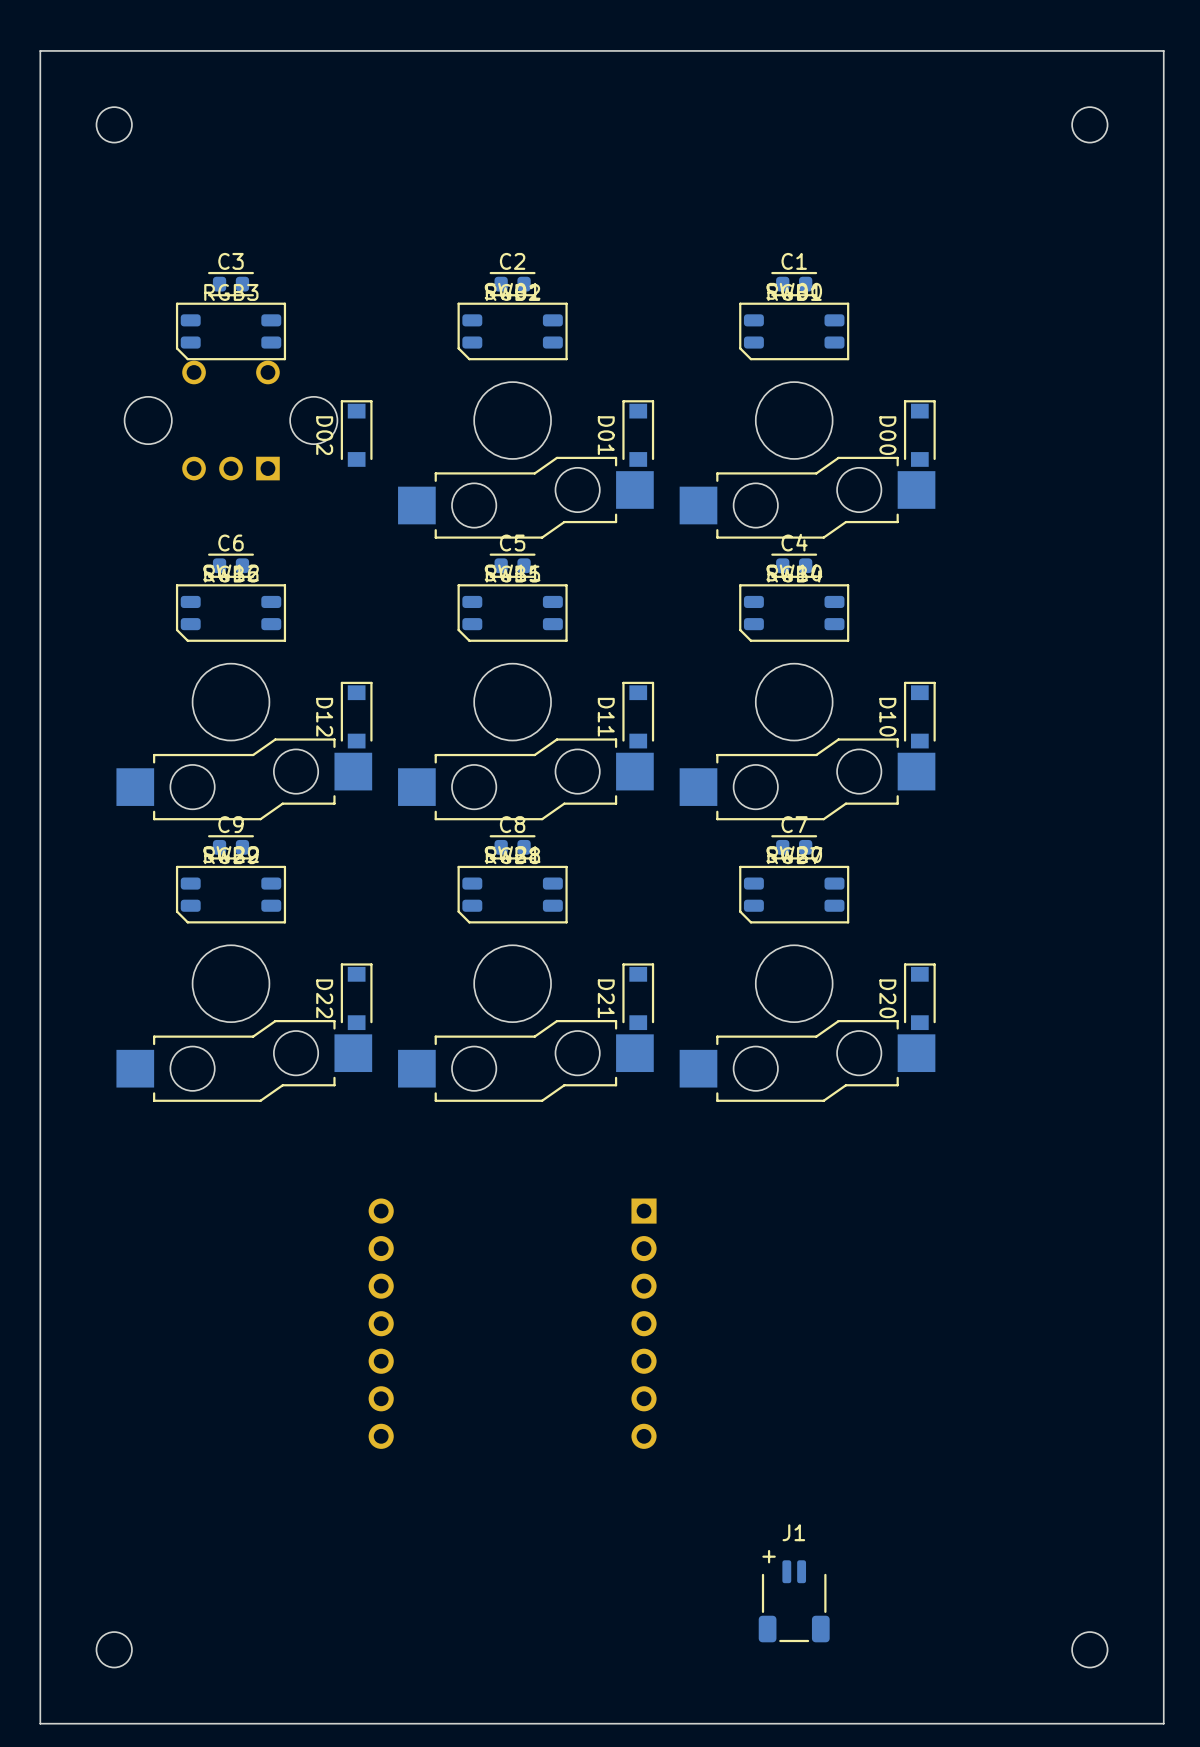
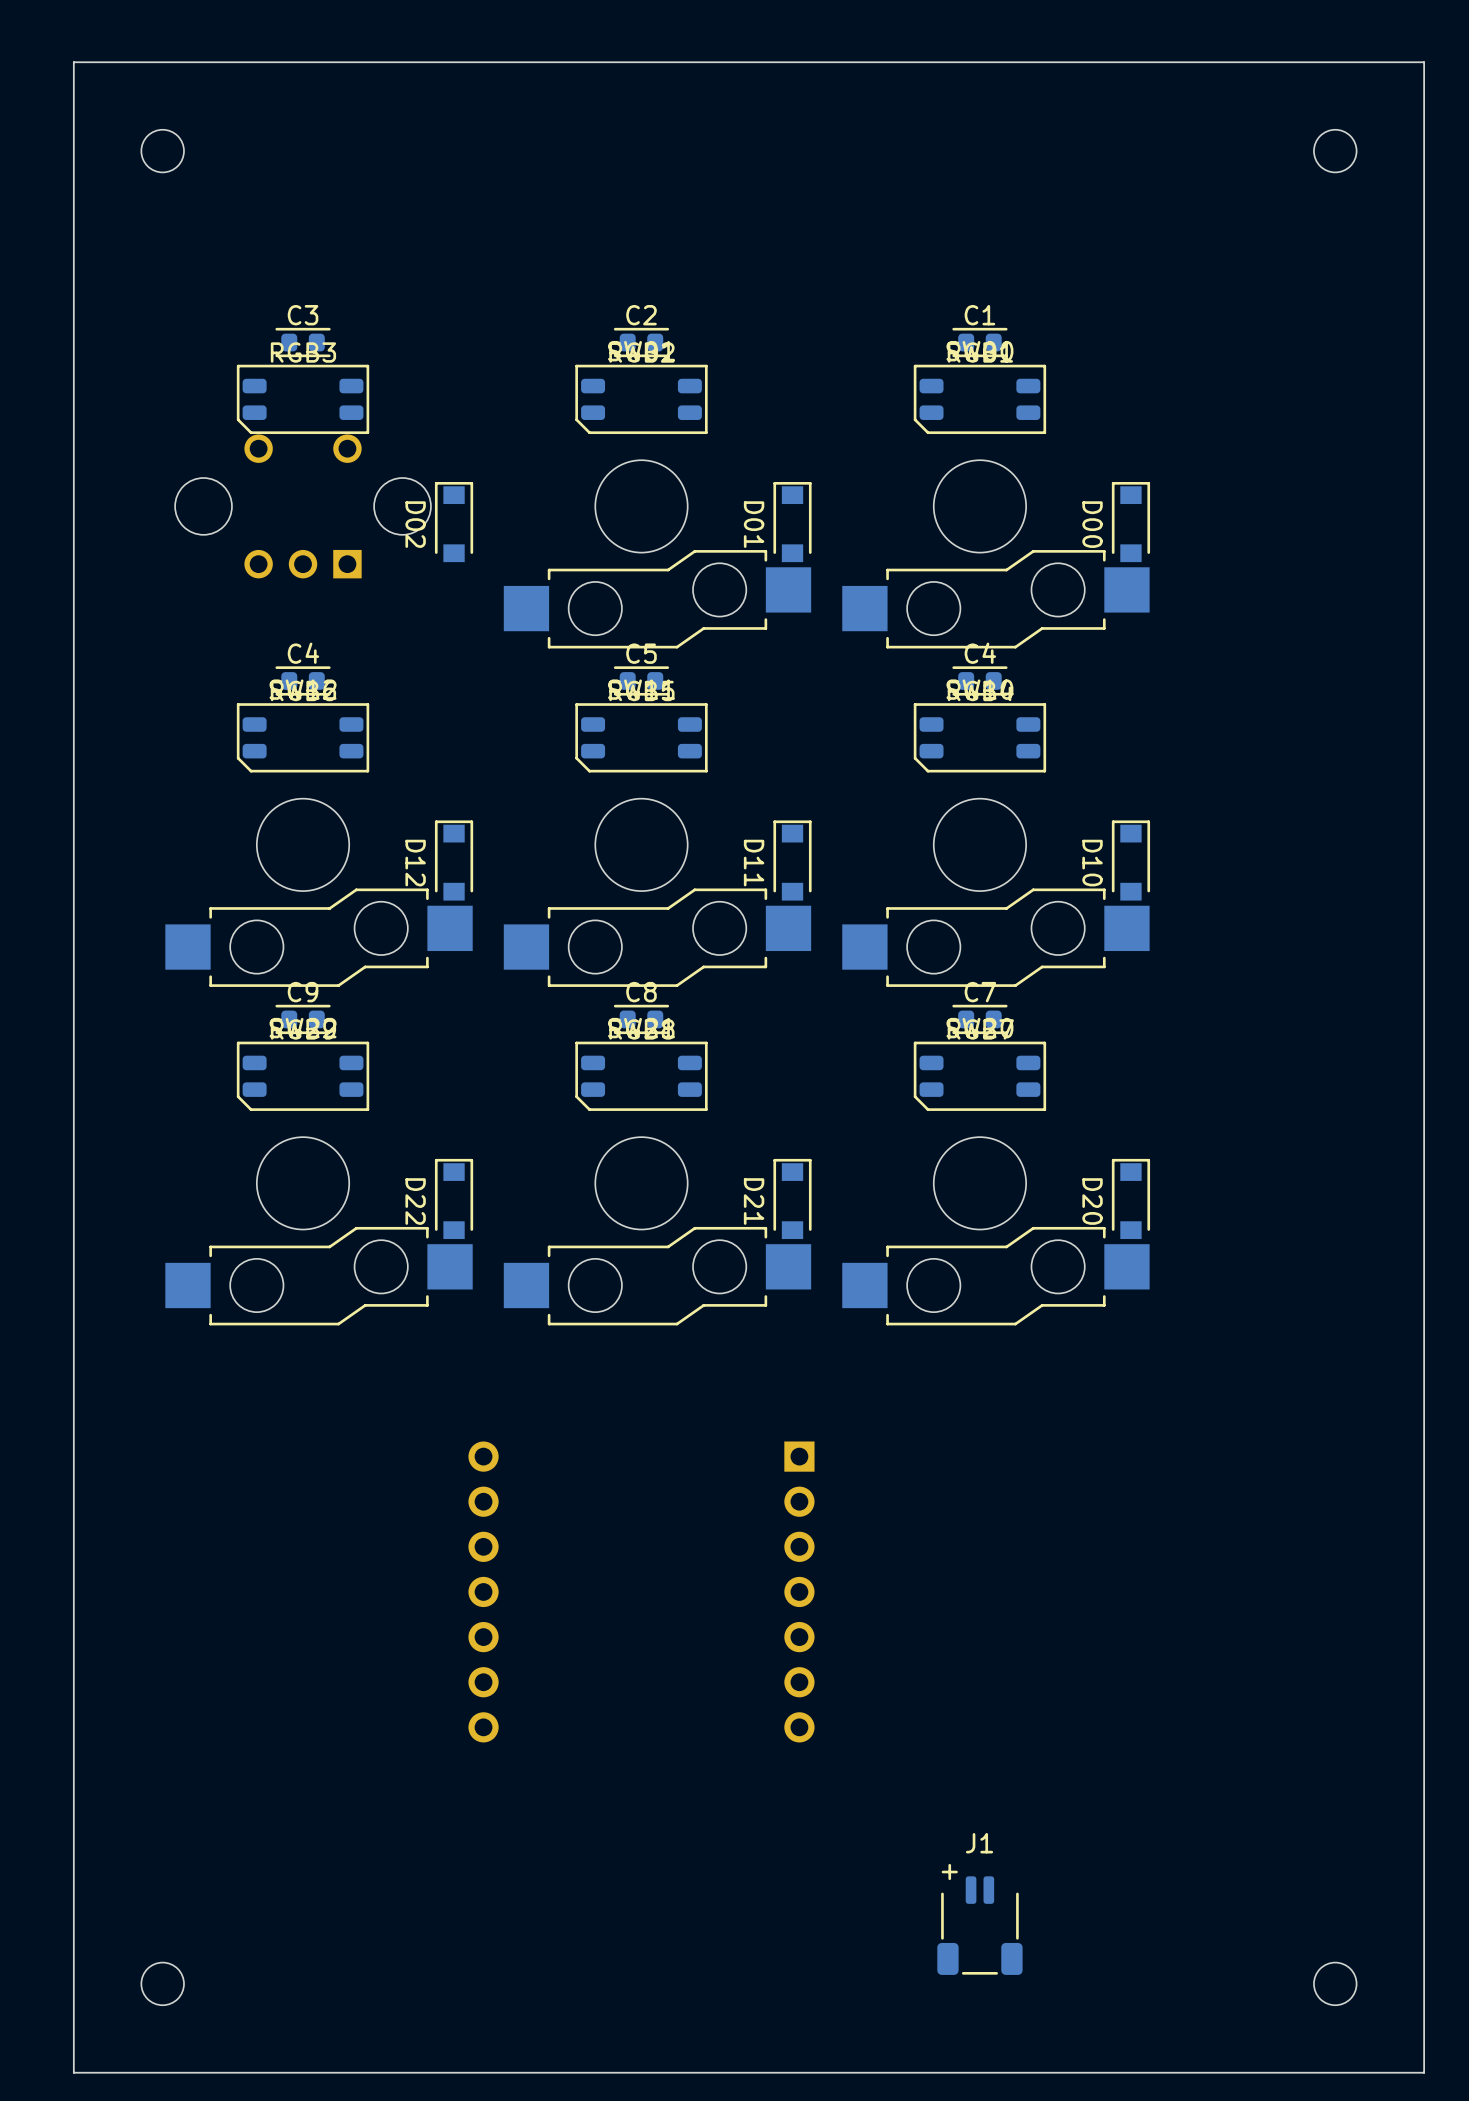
C6 name: C6 (231, 543) -> C4 (303, 653)

